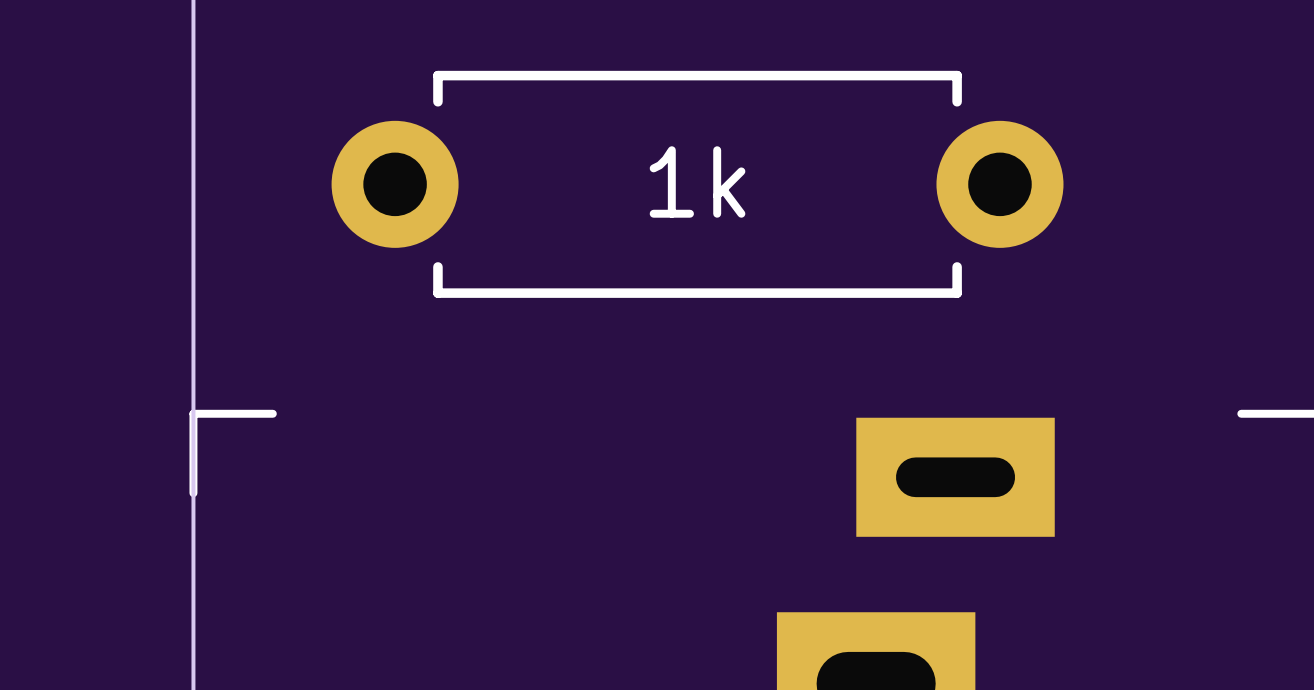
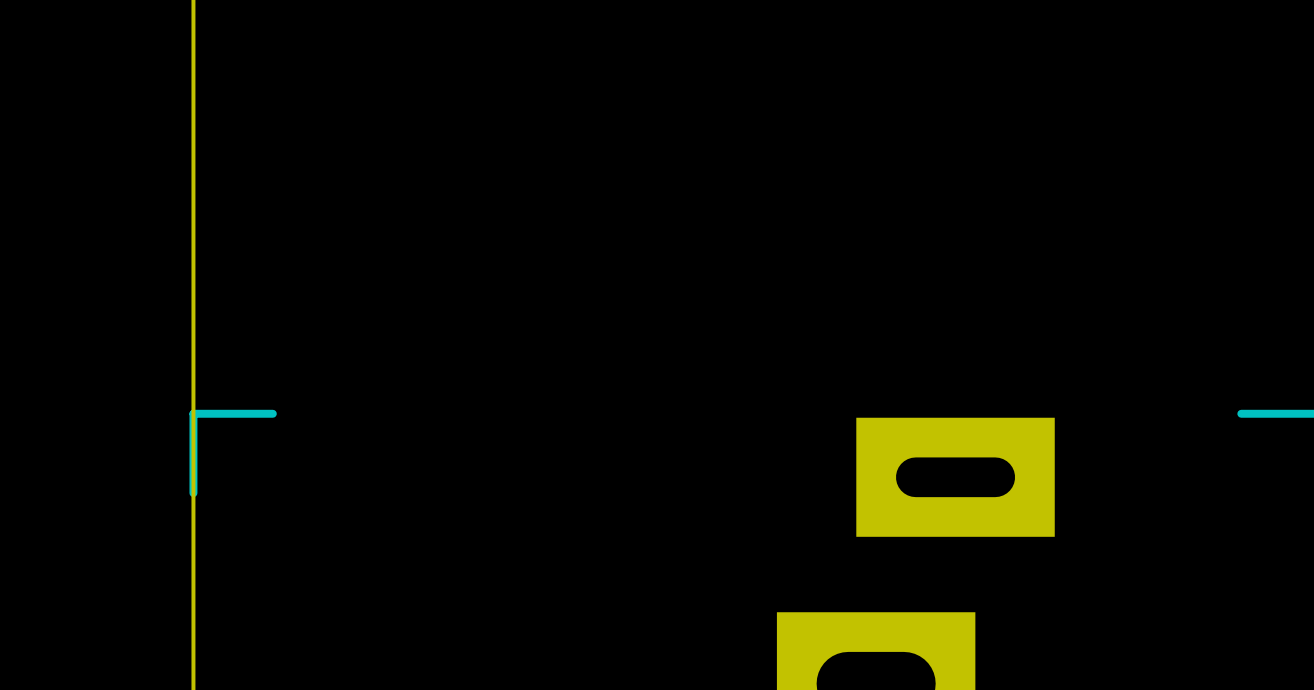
part: 1k (697, 184) -> none

